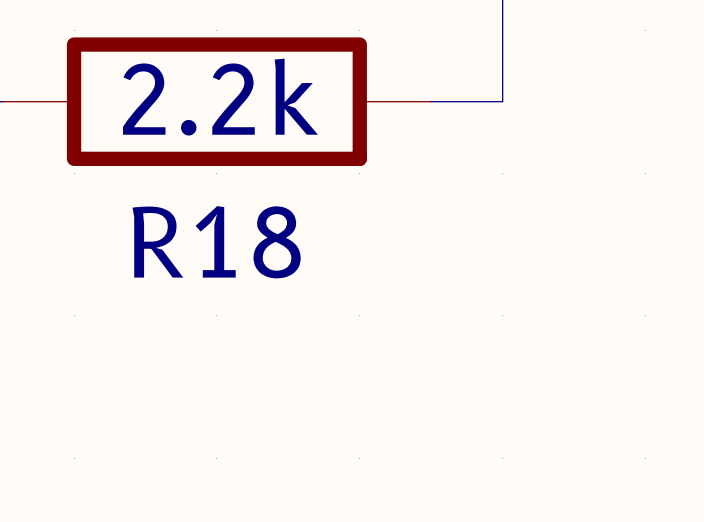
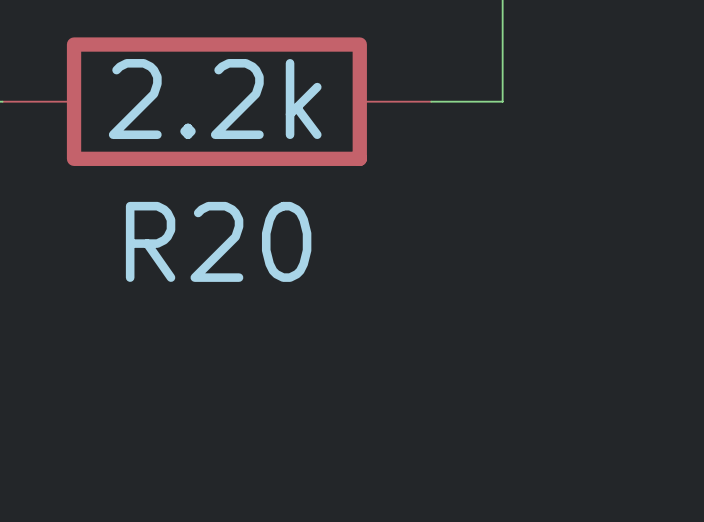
R18 name: R18 (216, 242) -> R20 (218, 241)

